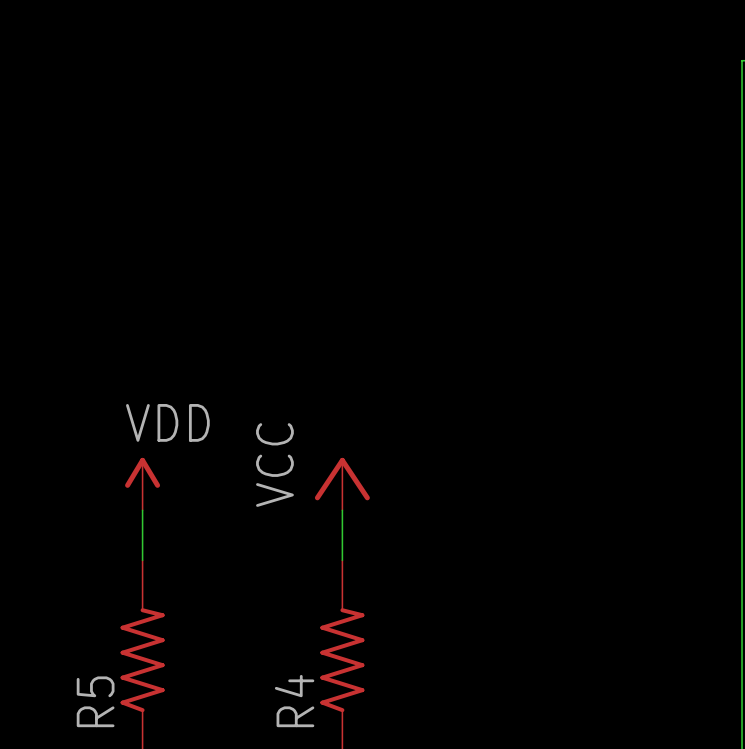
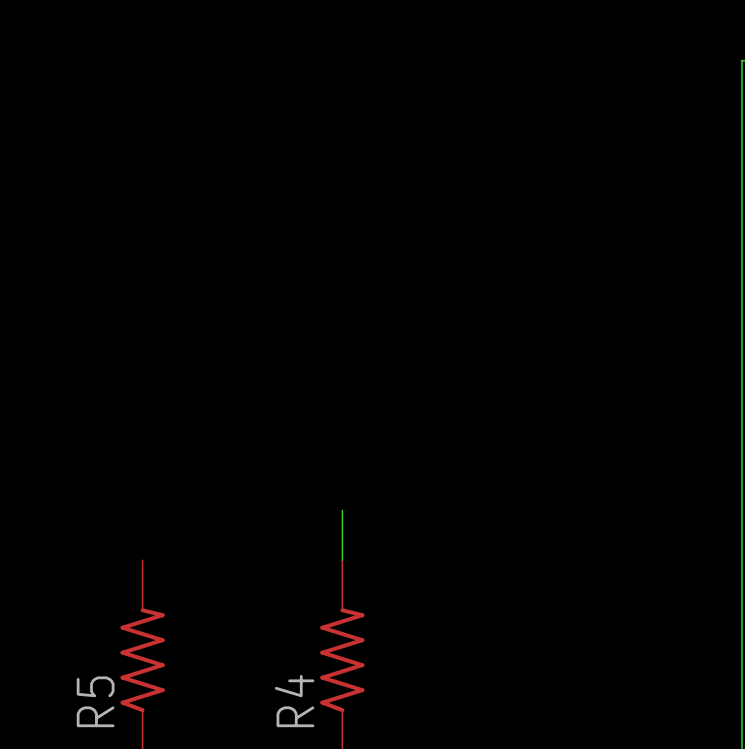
power symbol: VDD (142, 484) -> none
power symbol: VCC (342, 484) -> none
wire: (142, 510) (142, 560) -> none

